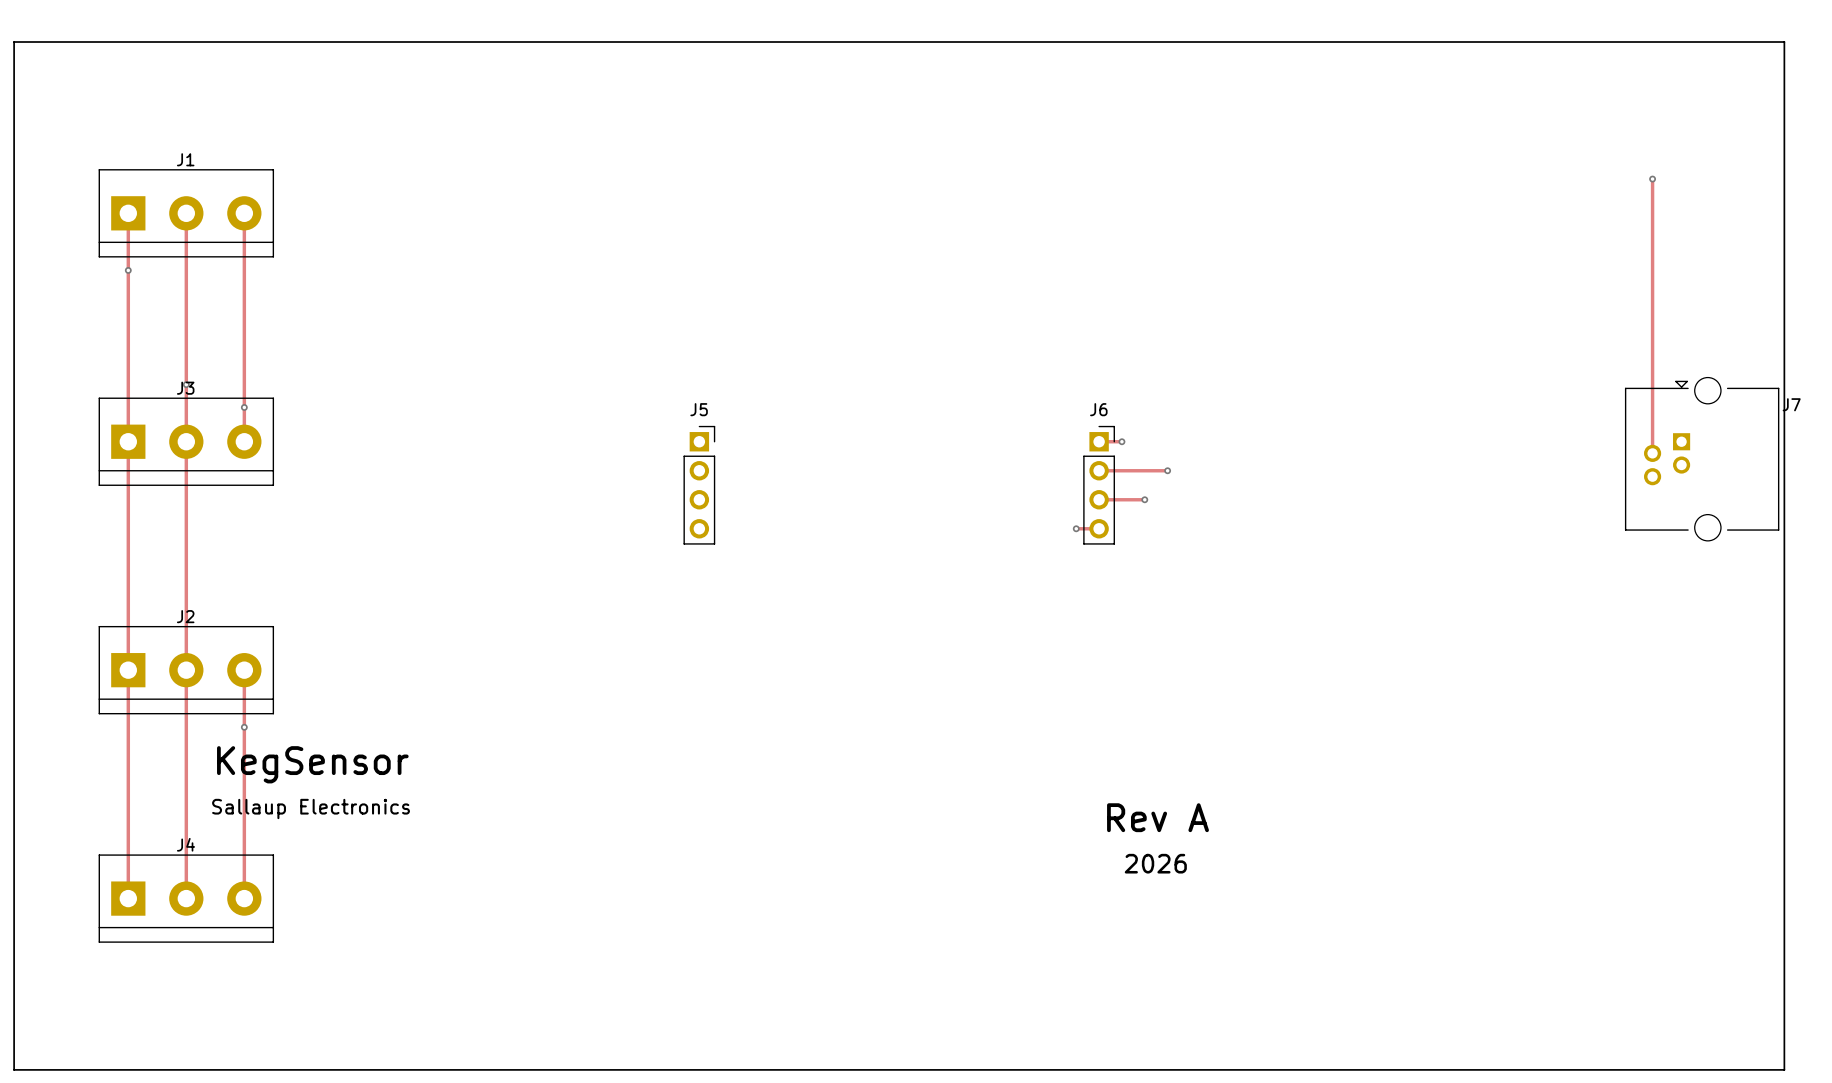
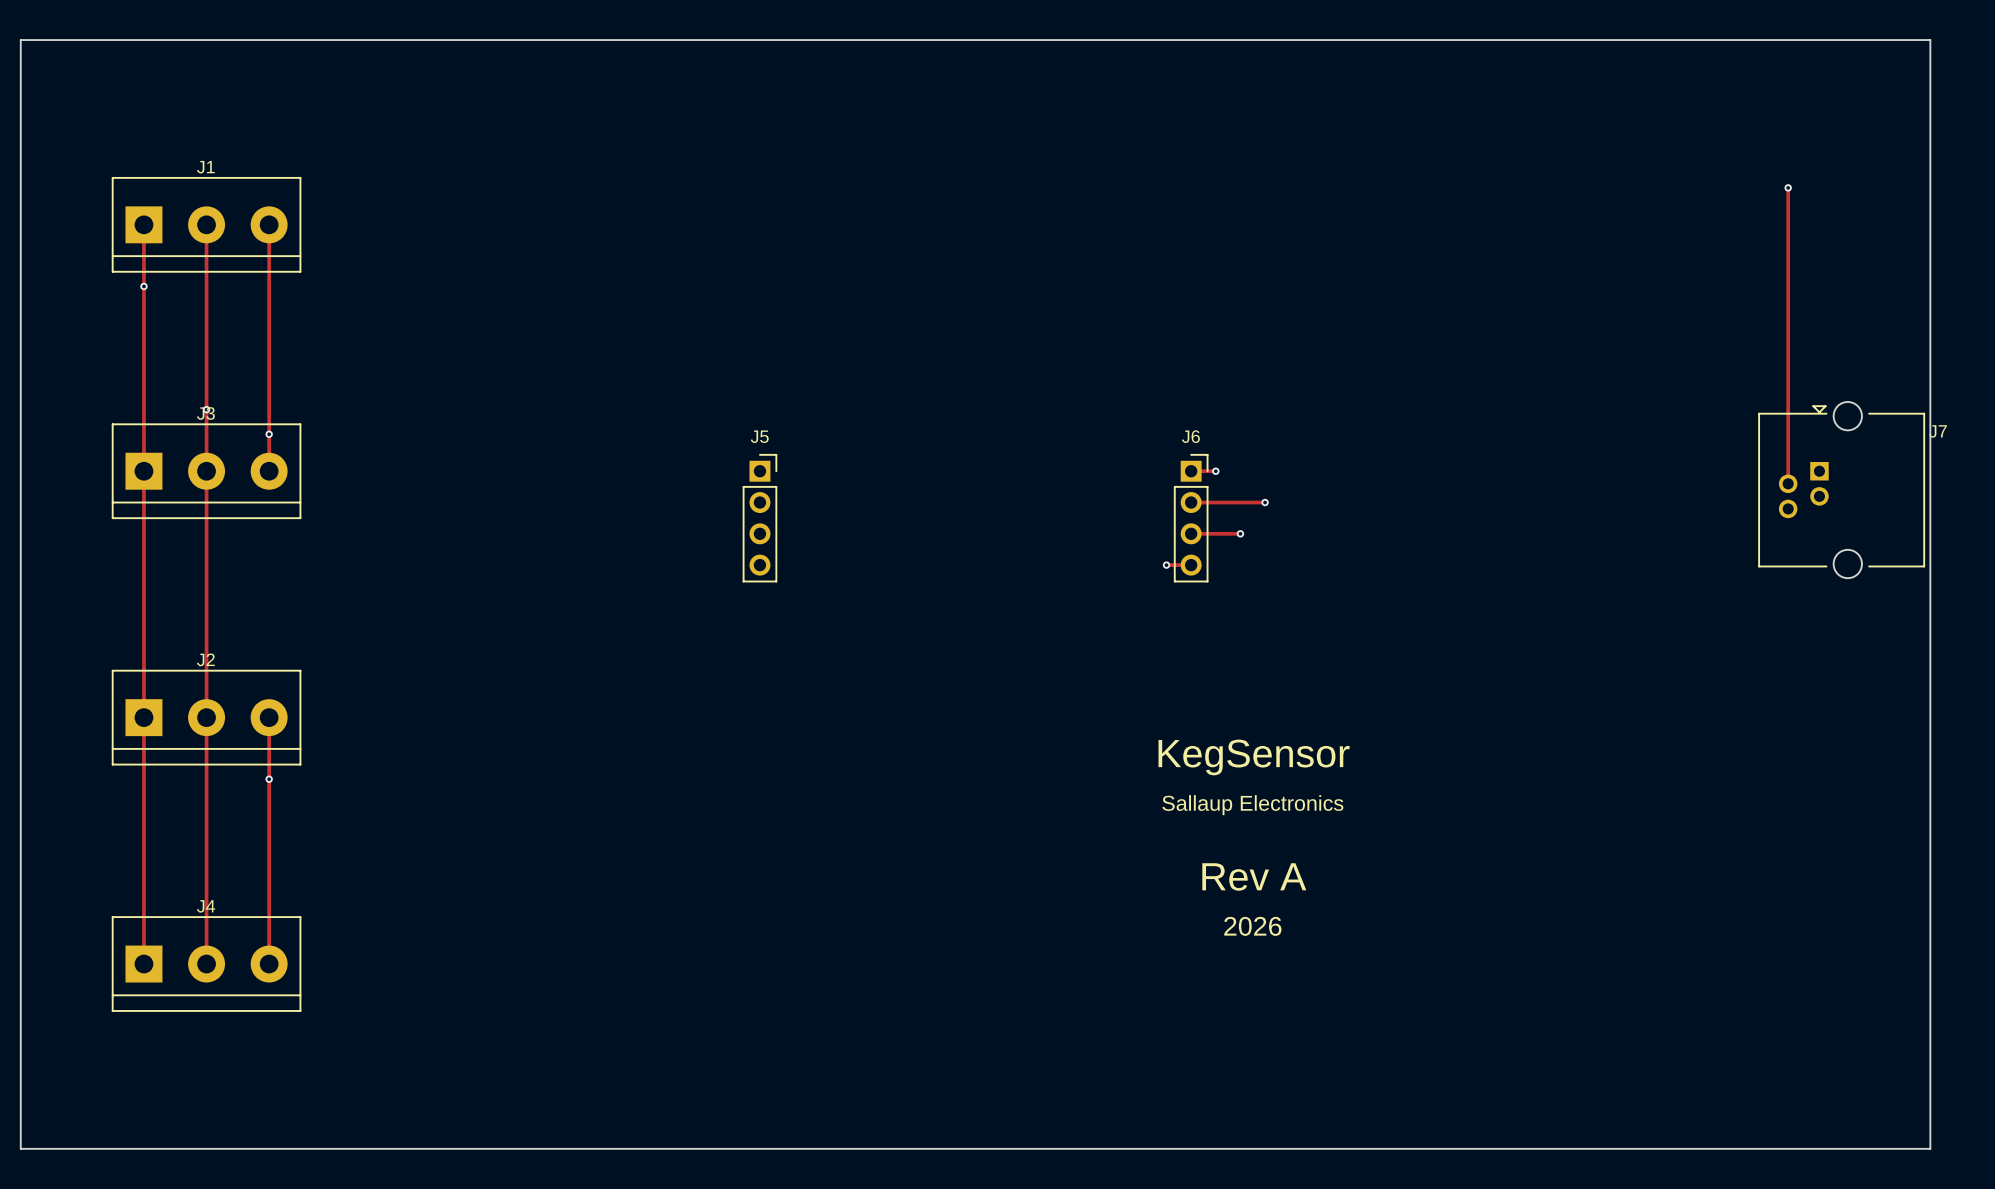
text: none -> KegSensor (1254, 757)
text: none -> Sallaup Electronics (1252, 805)
text: KegSensor (312, 764) -> none
text: Sallaup Electronics (311, 808) -> none

